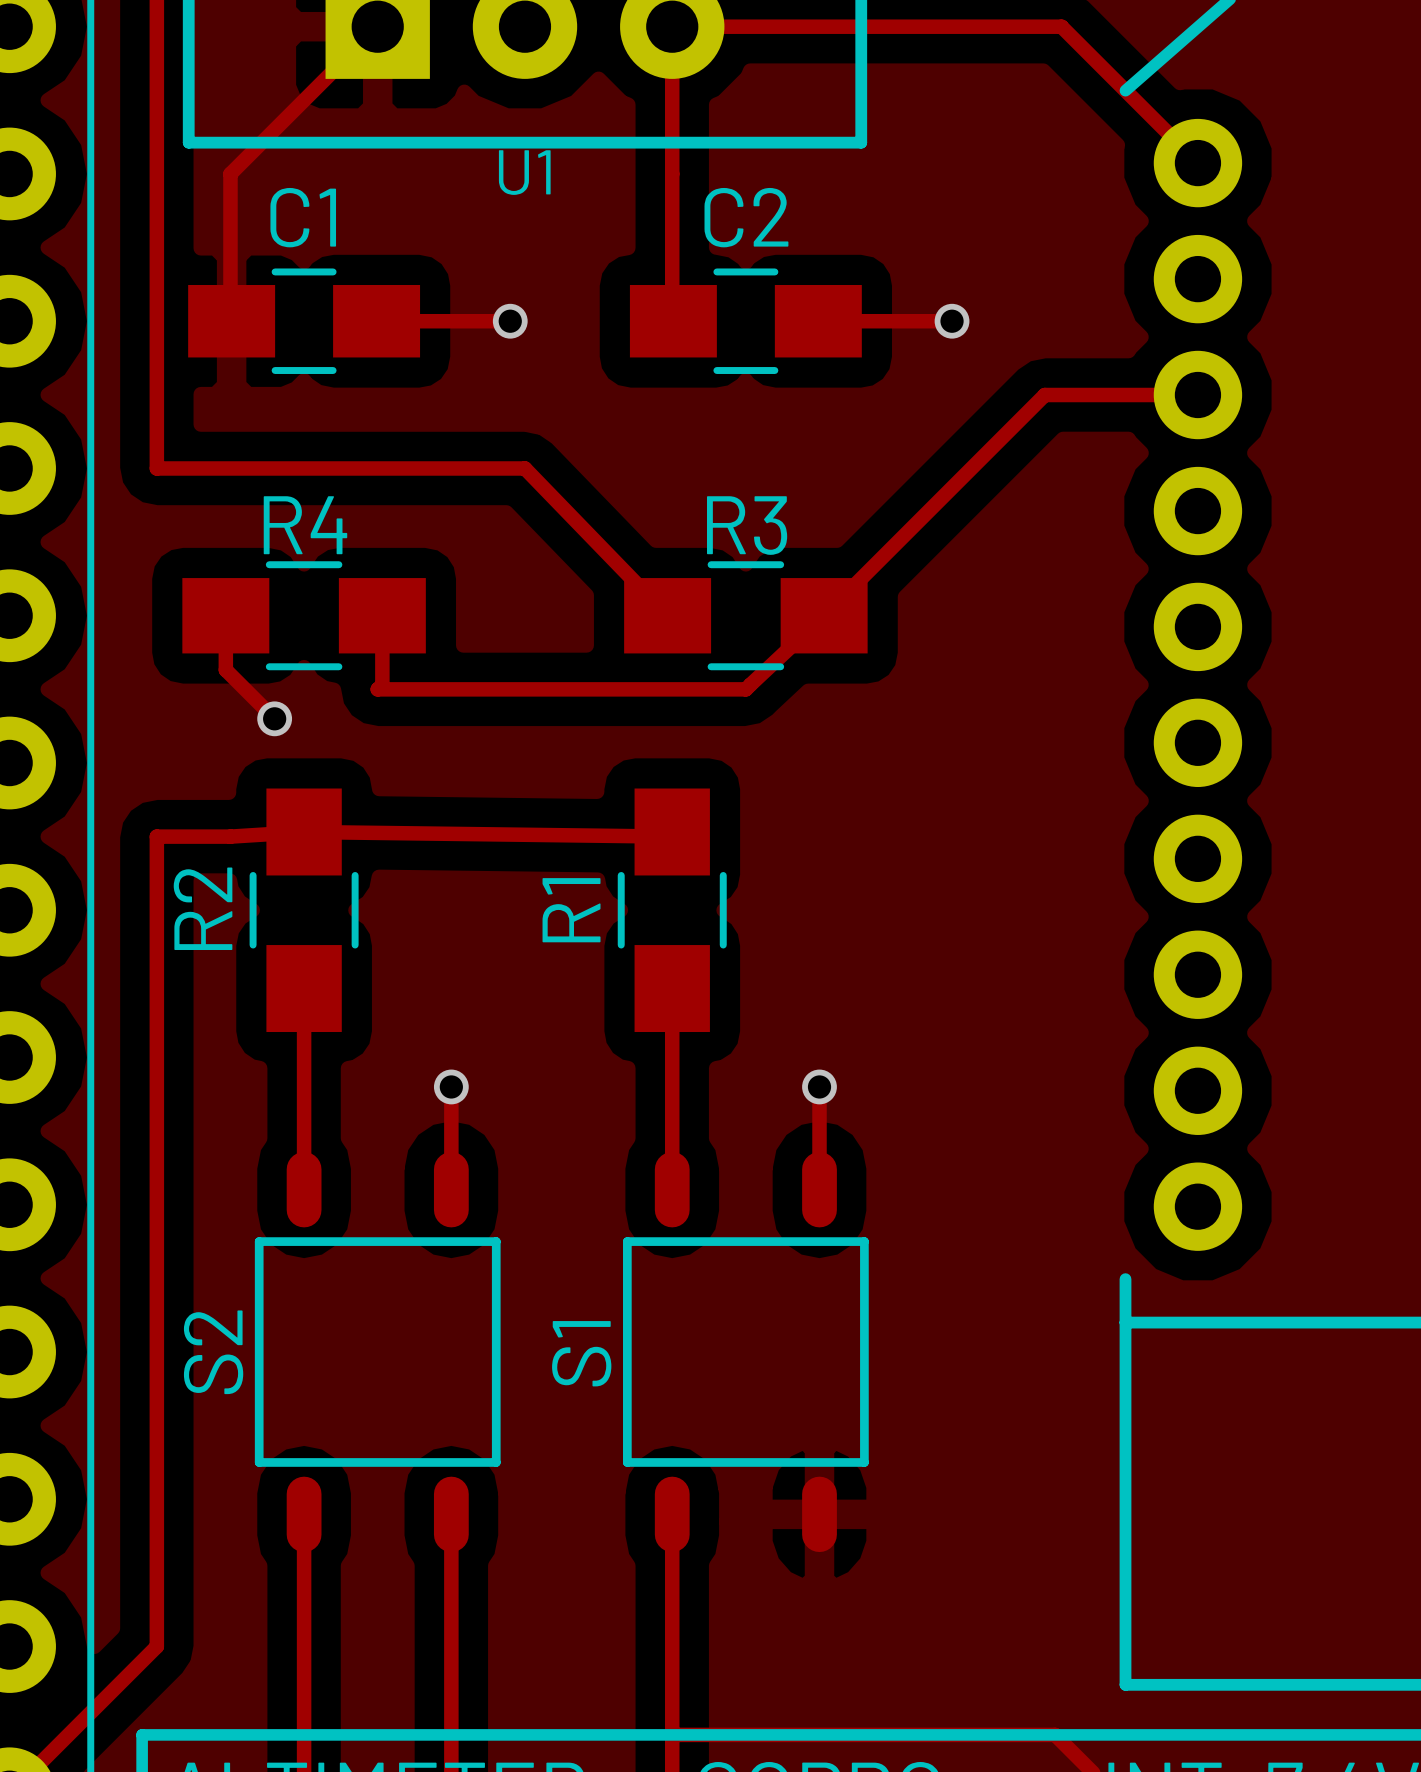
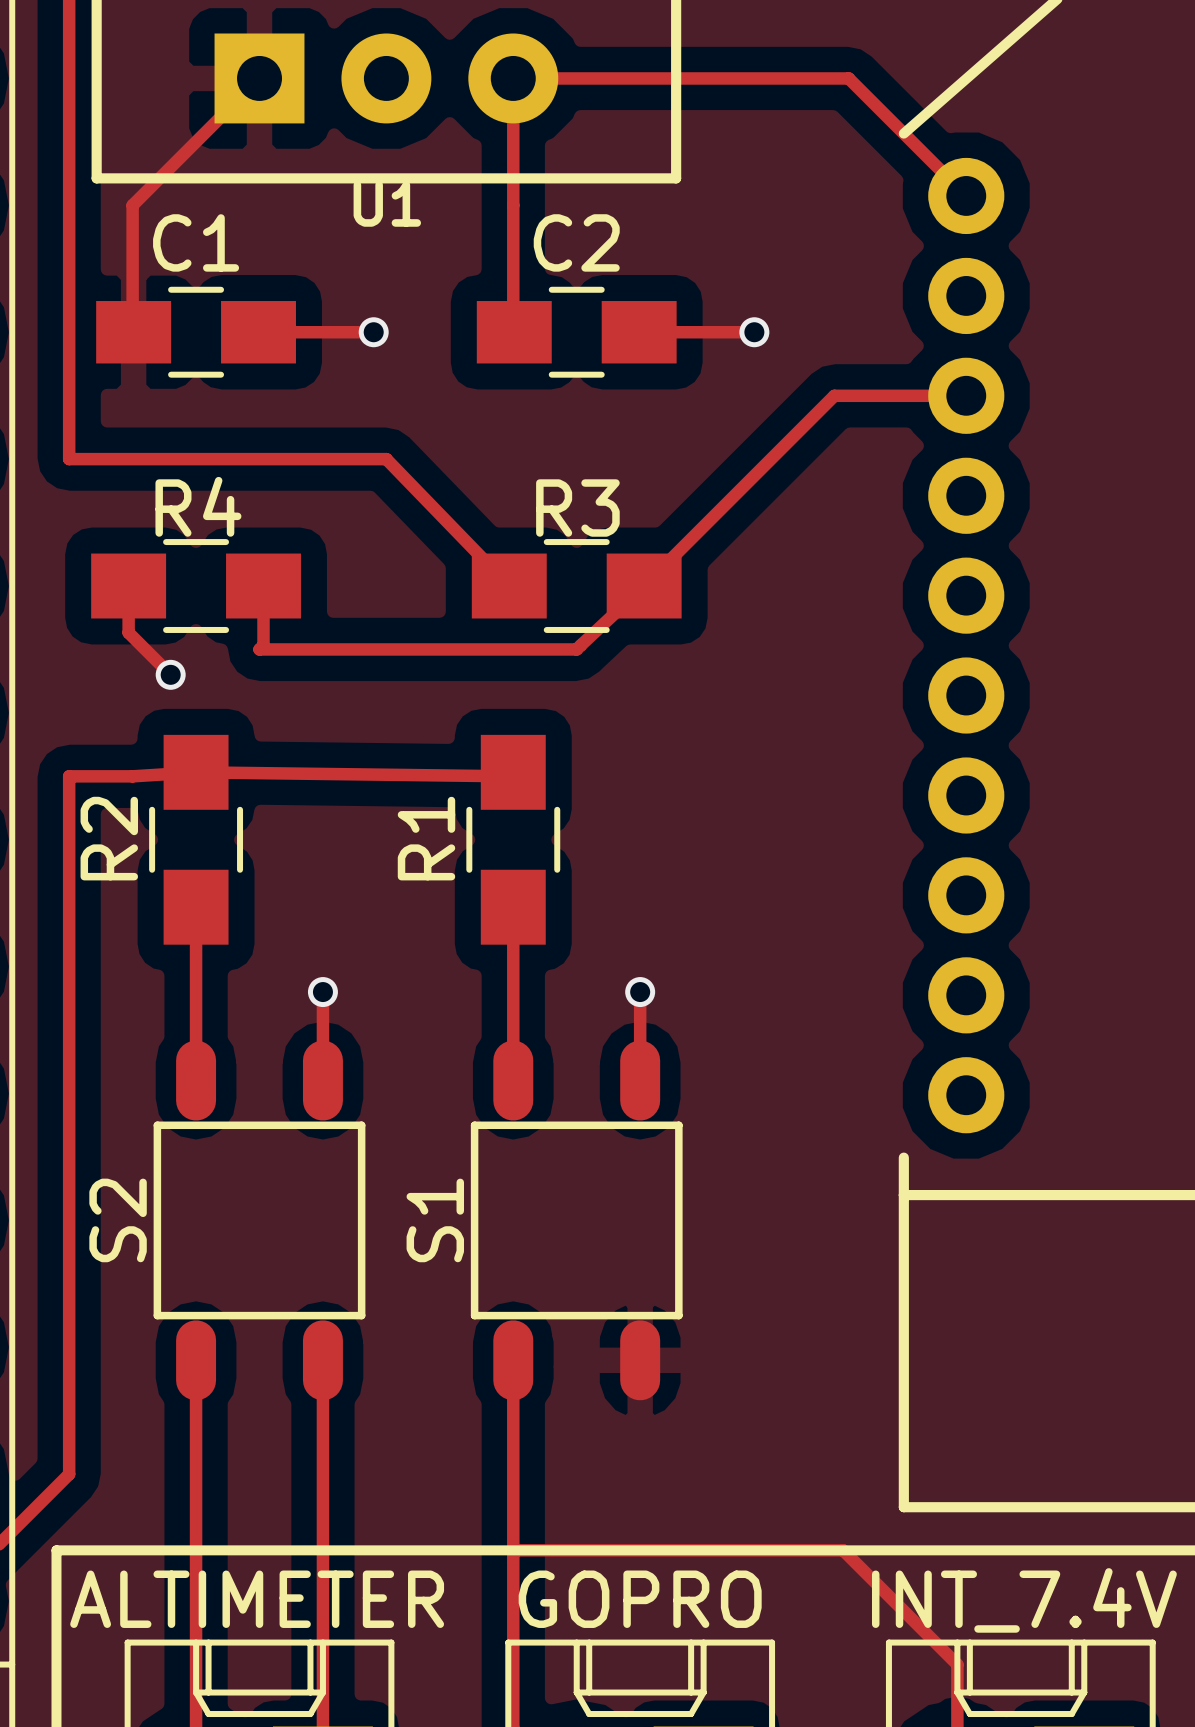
part footprint: [254, 1152, 501, 1553] -> [153, 1040, 366, 1401]
part footprint: [622, 1152, 869, 1553] -> [470, 1040, 683, 1401]

